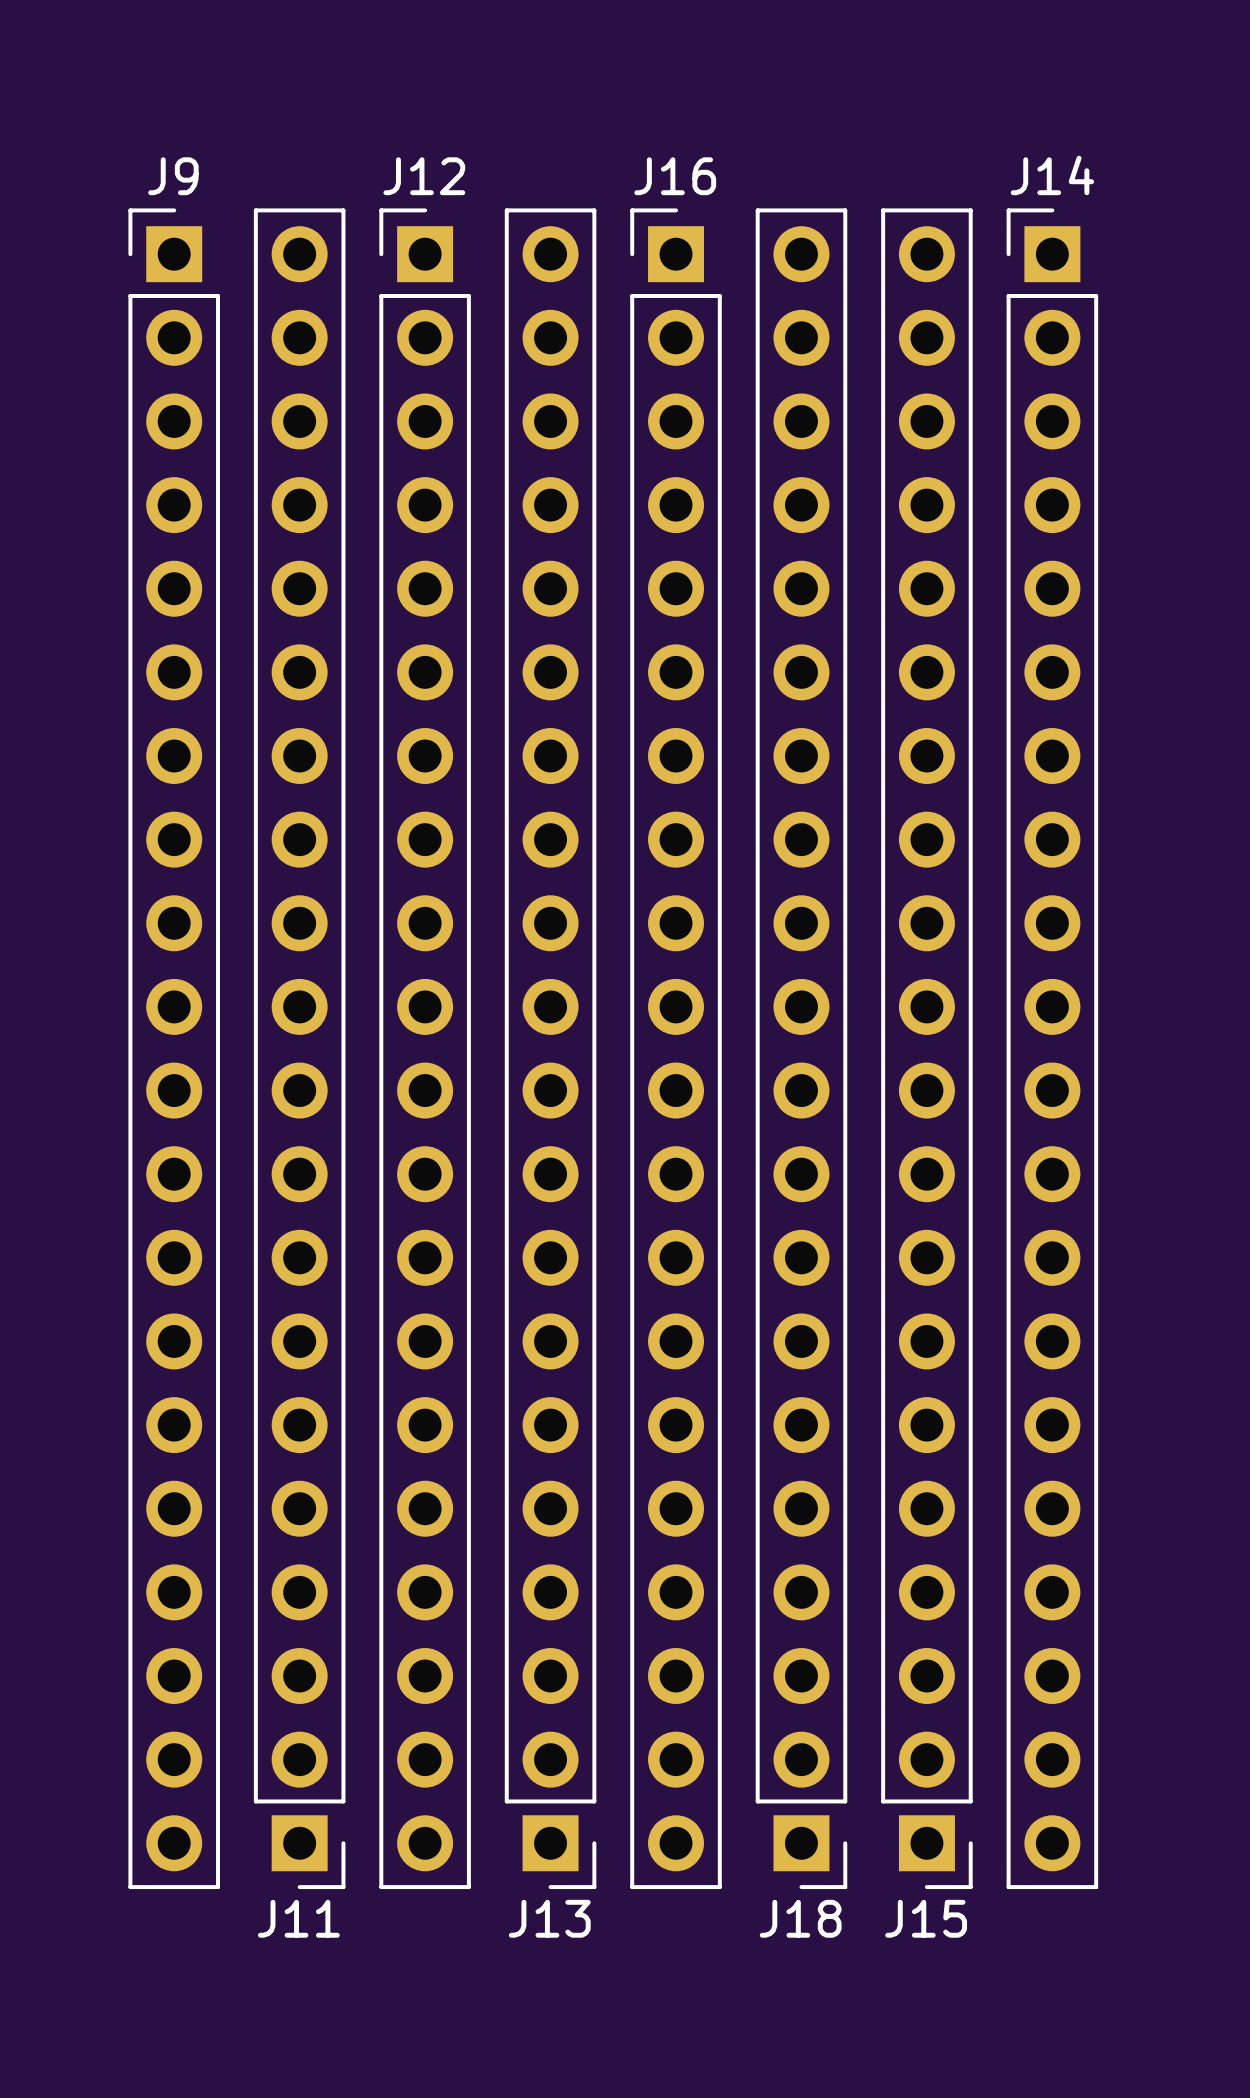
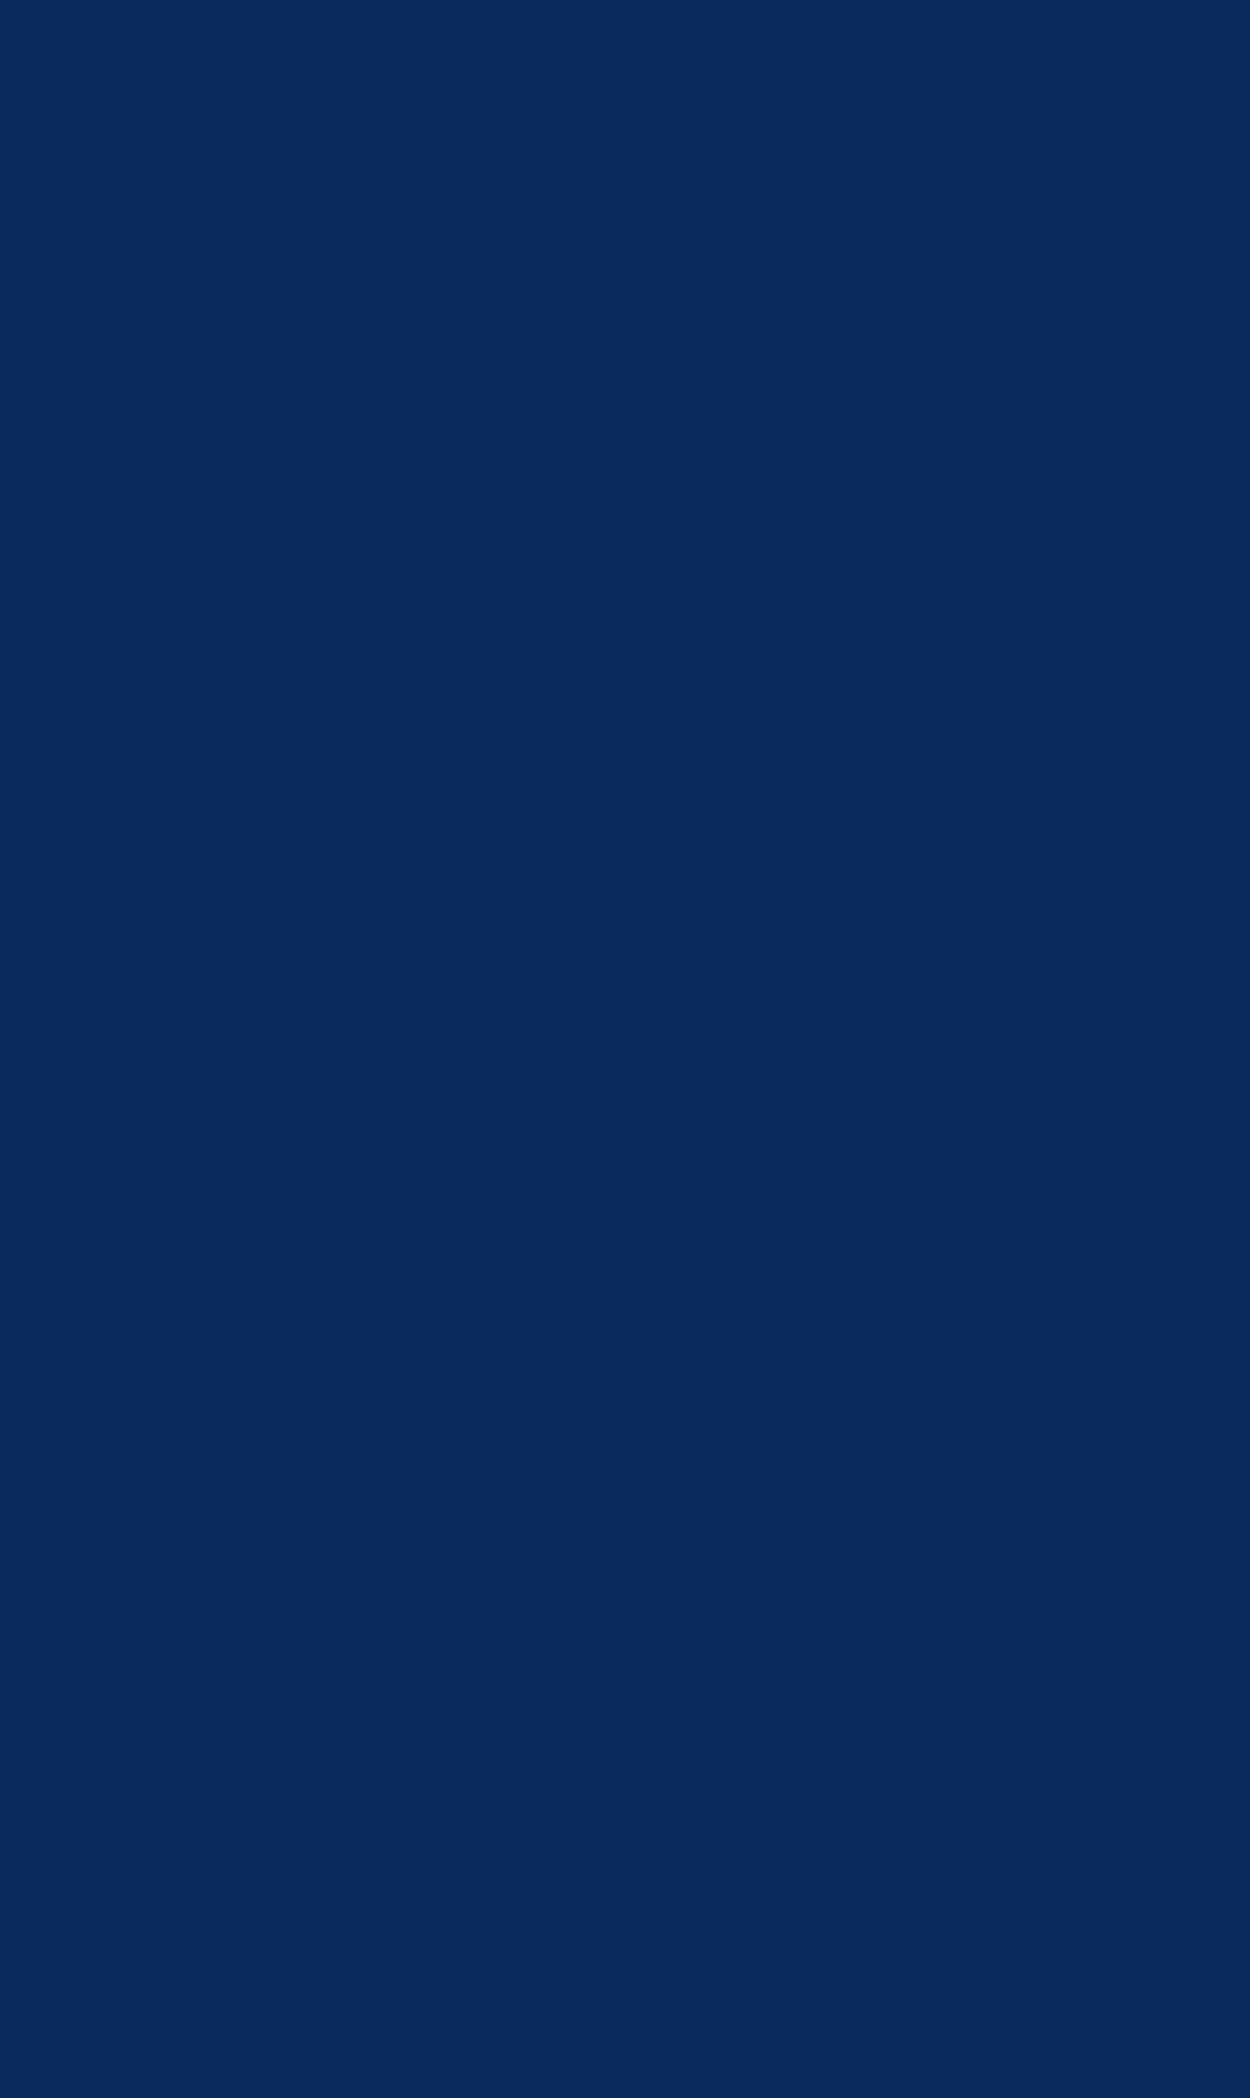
J9: (174, 1048) -> none
J11: (299, 1048) -> none
J12: (425, 1048) -> none
J13: (550, 1048) -> none
J16: (676, 1048) -> none
J18: (801, 1048) -> none
J15: (926, 1048) -> none
J14: (1052, 1048) -> none

